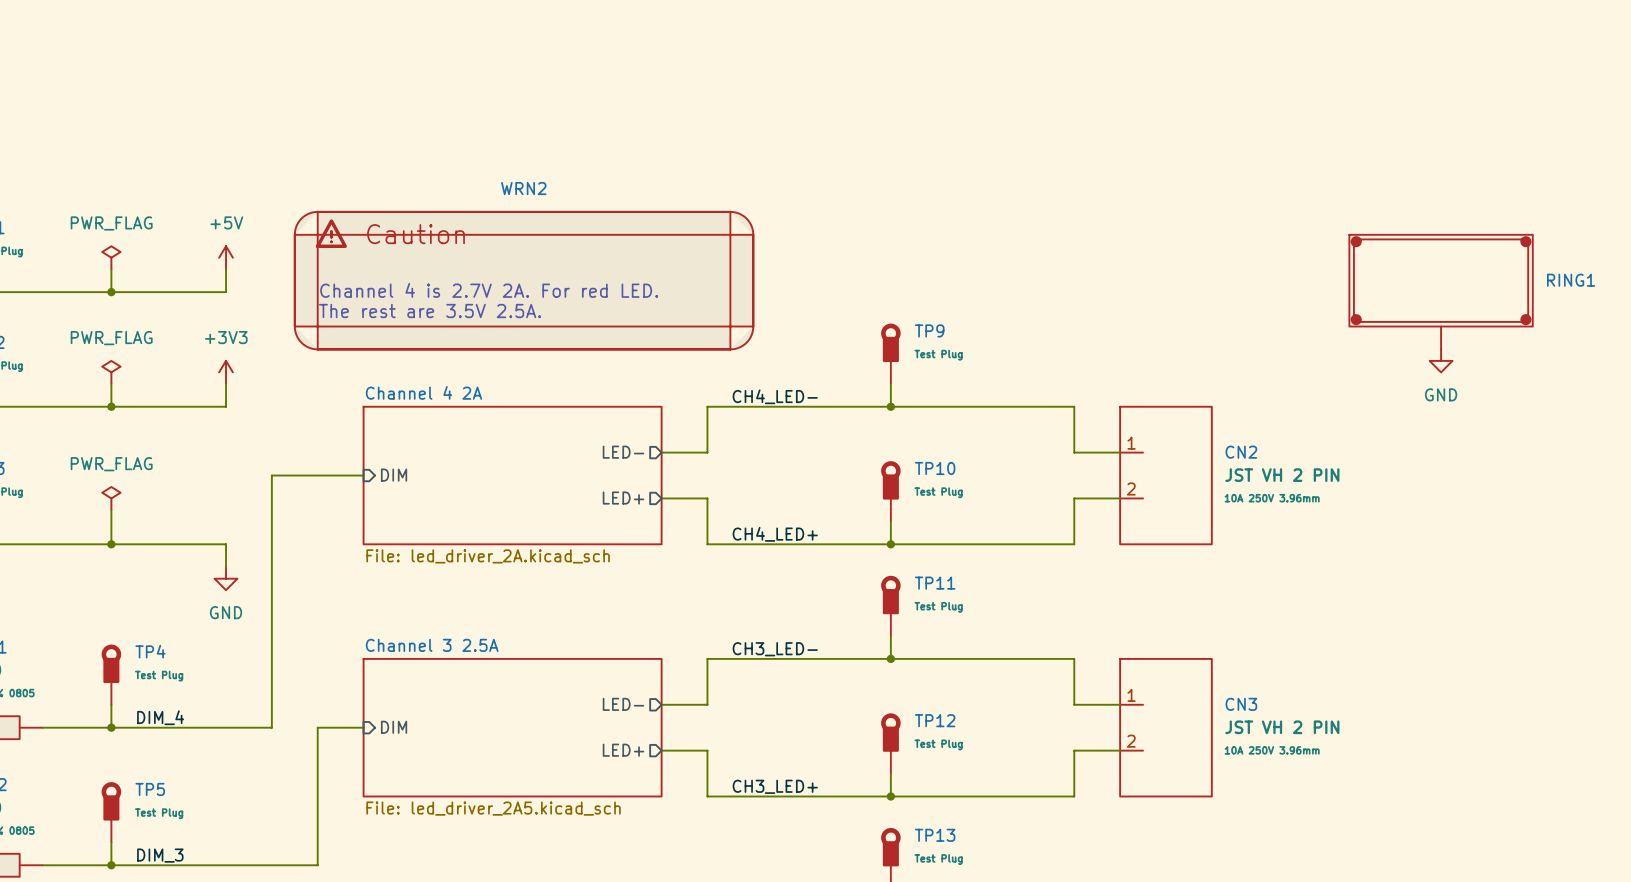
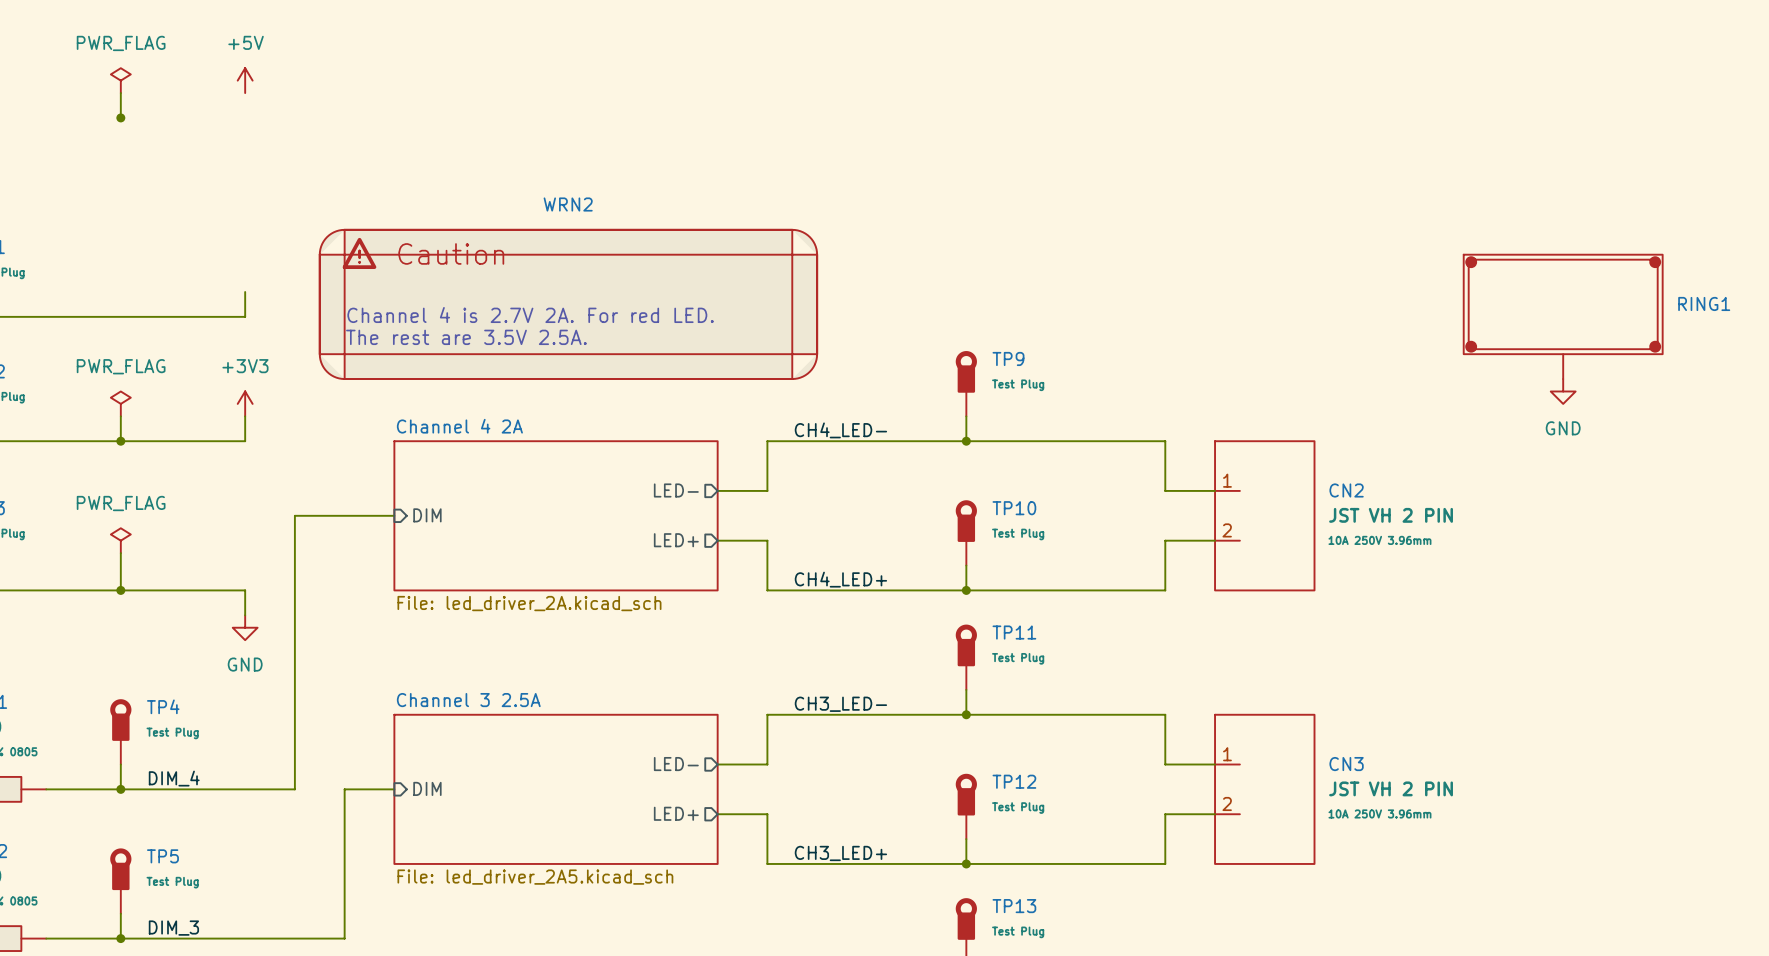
junction: none -> (120, 117)
power symbol position: PWR_FLAG (111, 257) -> PWR_FLAG (120, 80)
power symbol position: +5V (226, 257) -> +5V (245, 80)
wire: (111, 269) (111, 292) -> (120, 93) (120, 117)
junction: (111, 292) -> none

